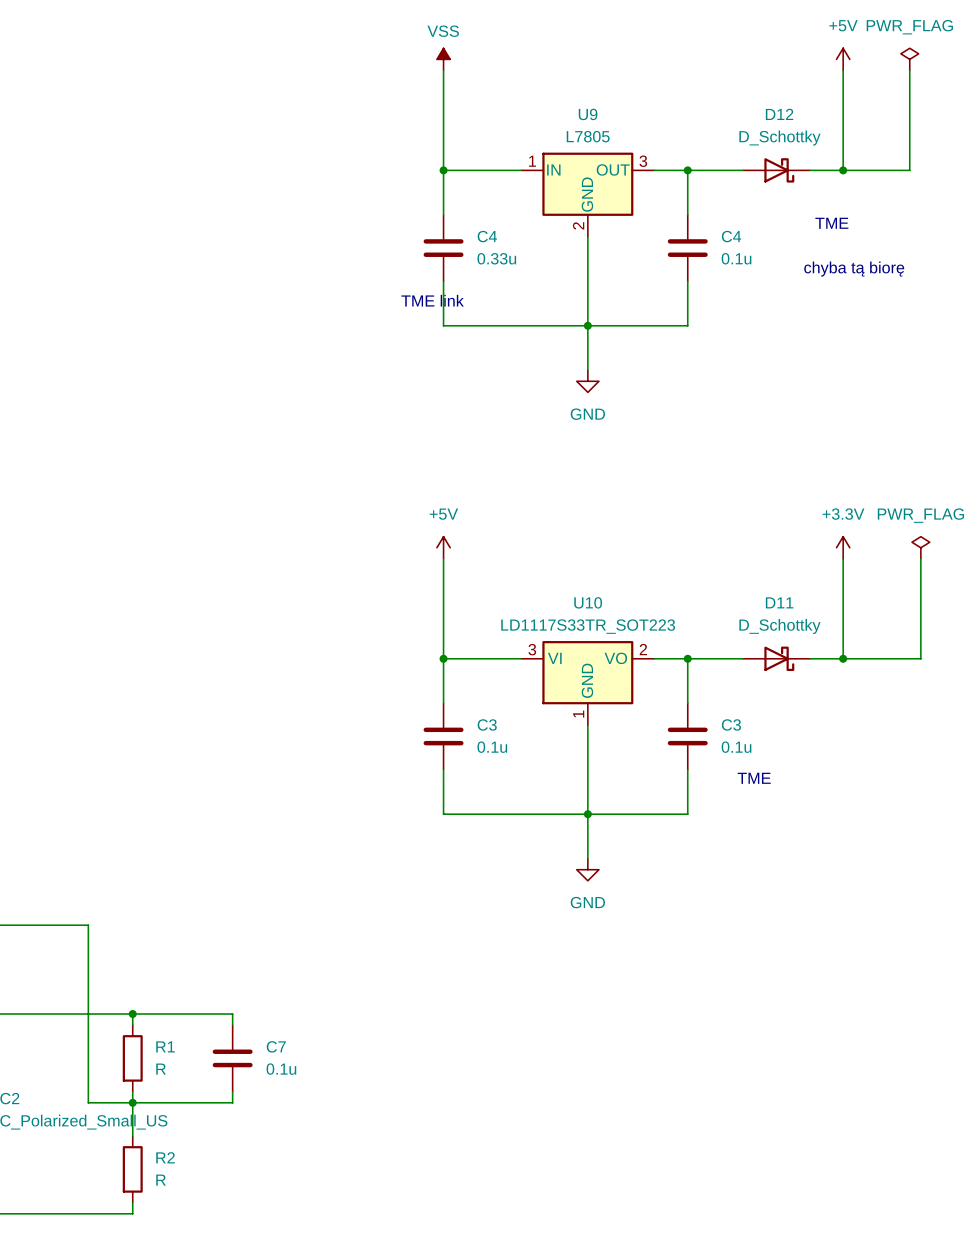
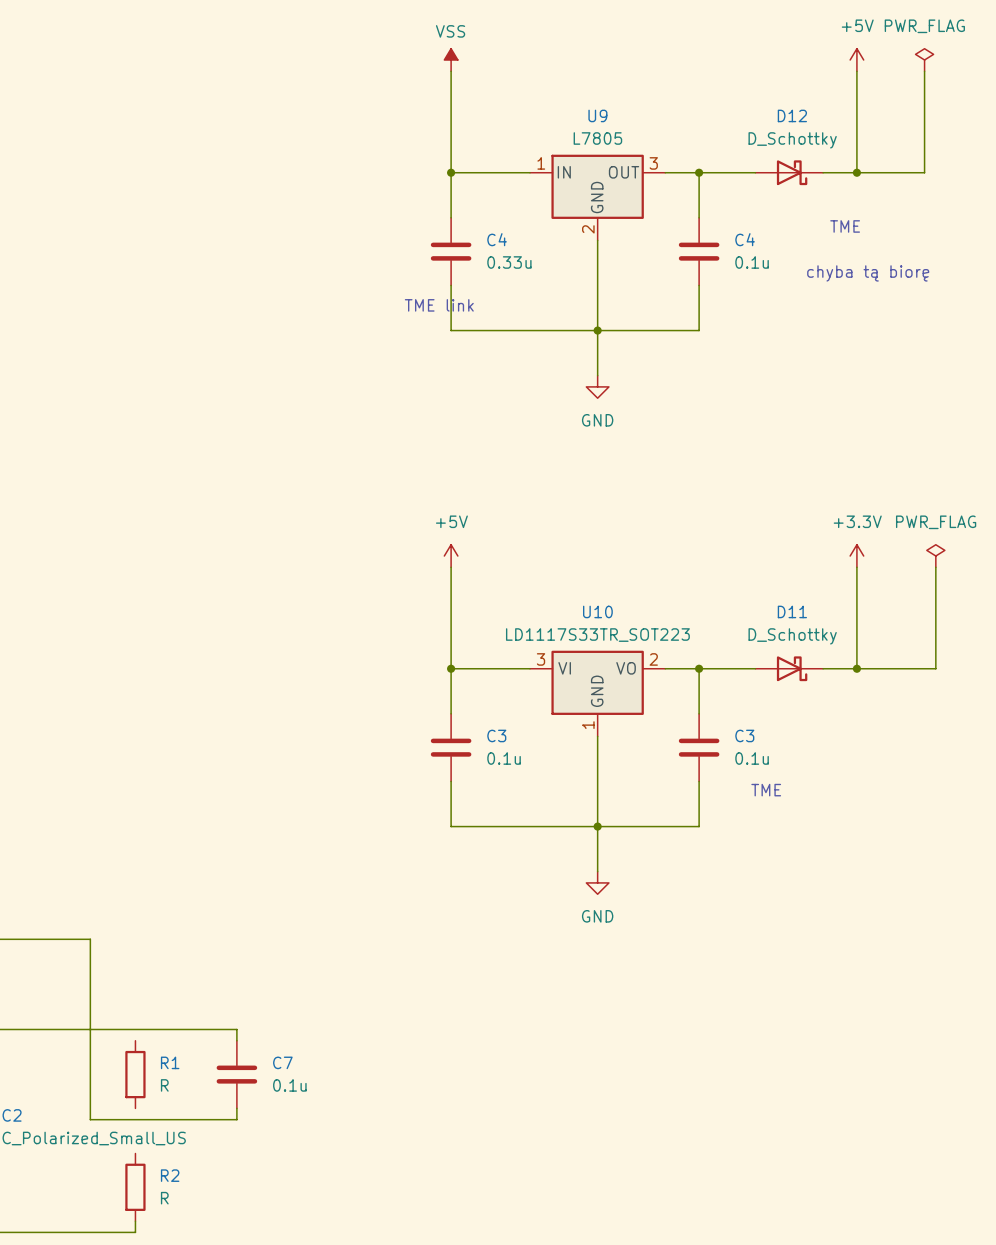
wire: (132, 1014) (132, 1025) -> none
junction: (132, 1014) -> none
wire: (132, 1091) (132, 1136) -> none
junction: (132, 1102) -> none

